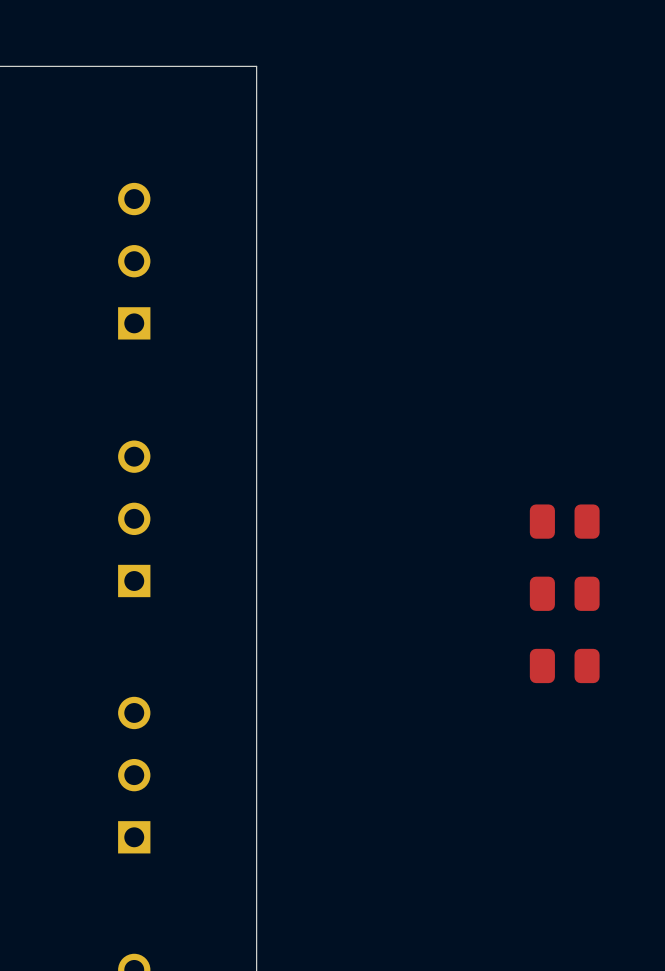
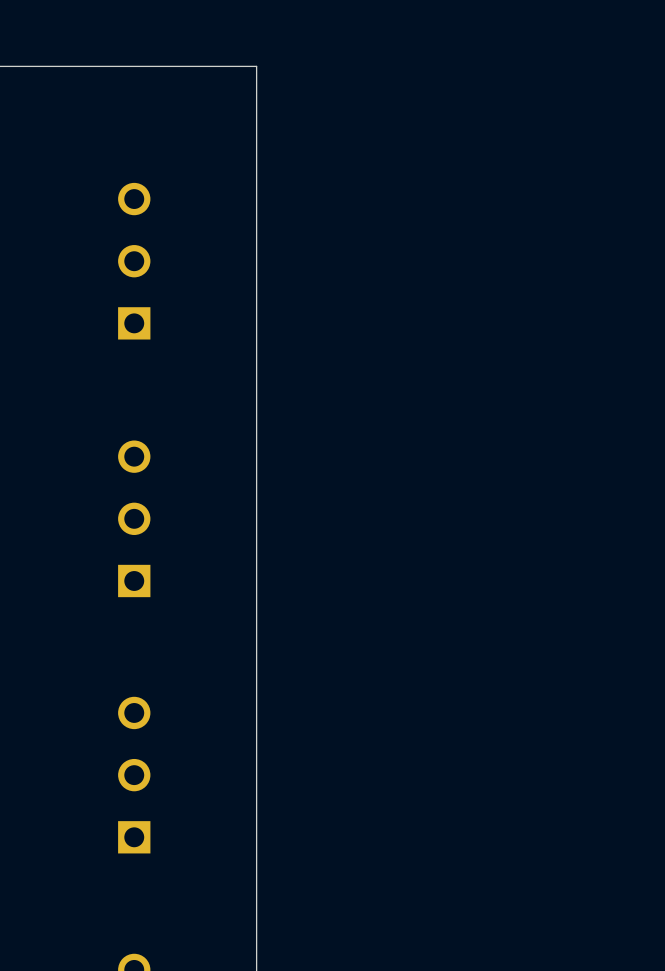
part: (564, 521) -> none
part: (564, 593) -> none
part: (564, 665) -> none

